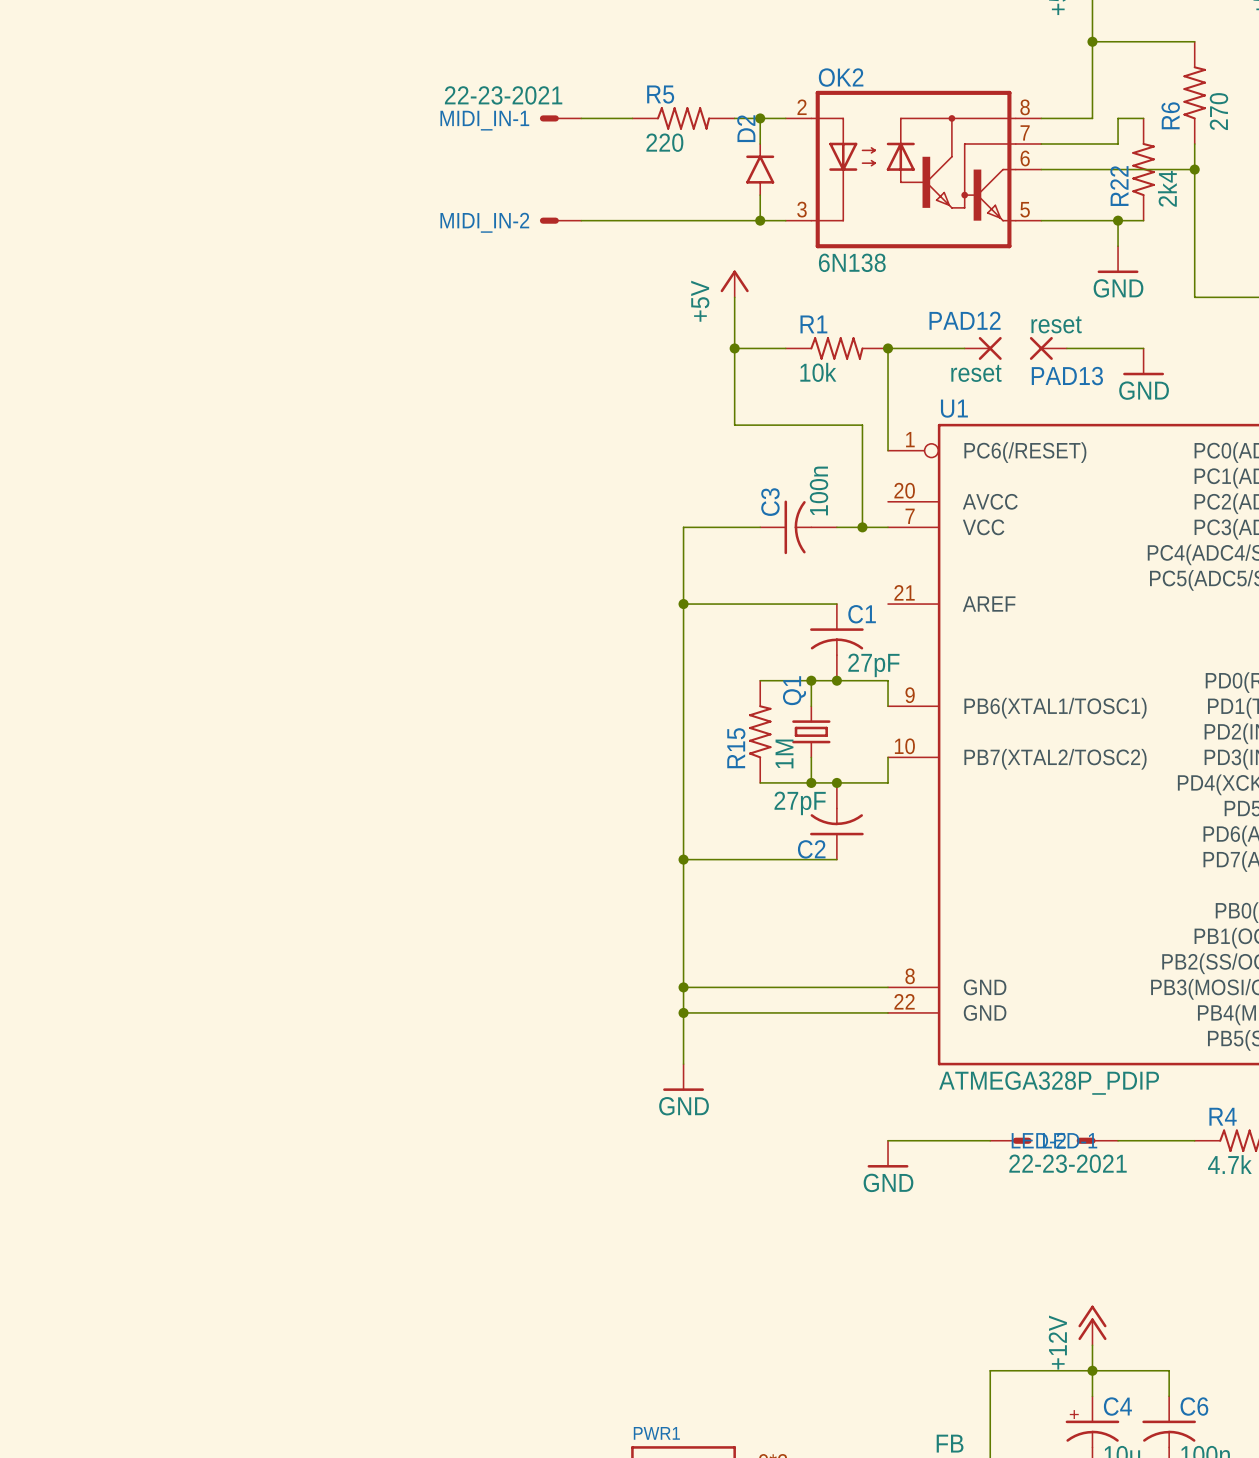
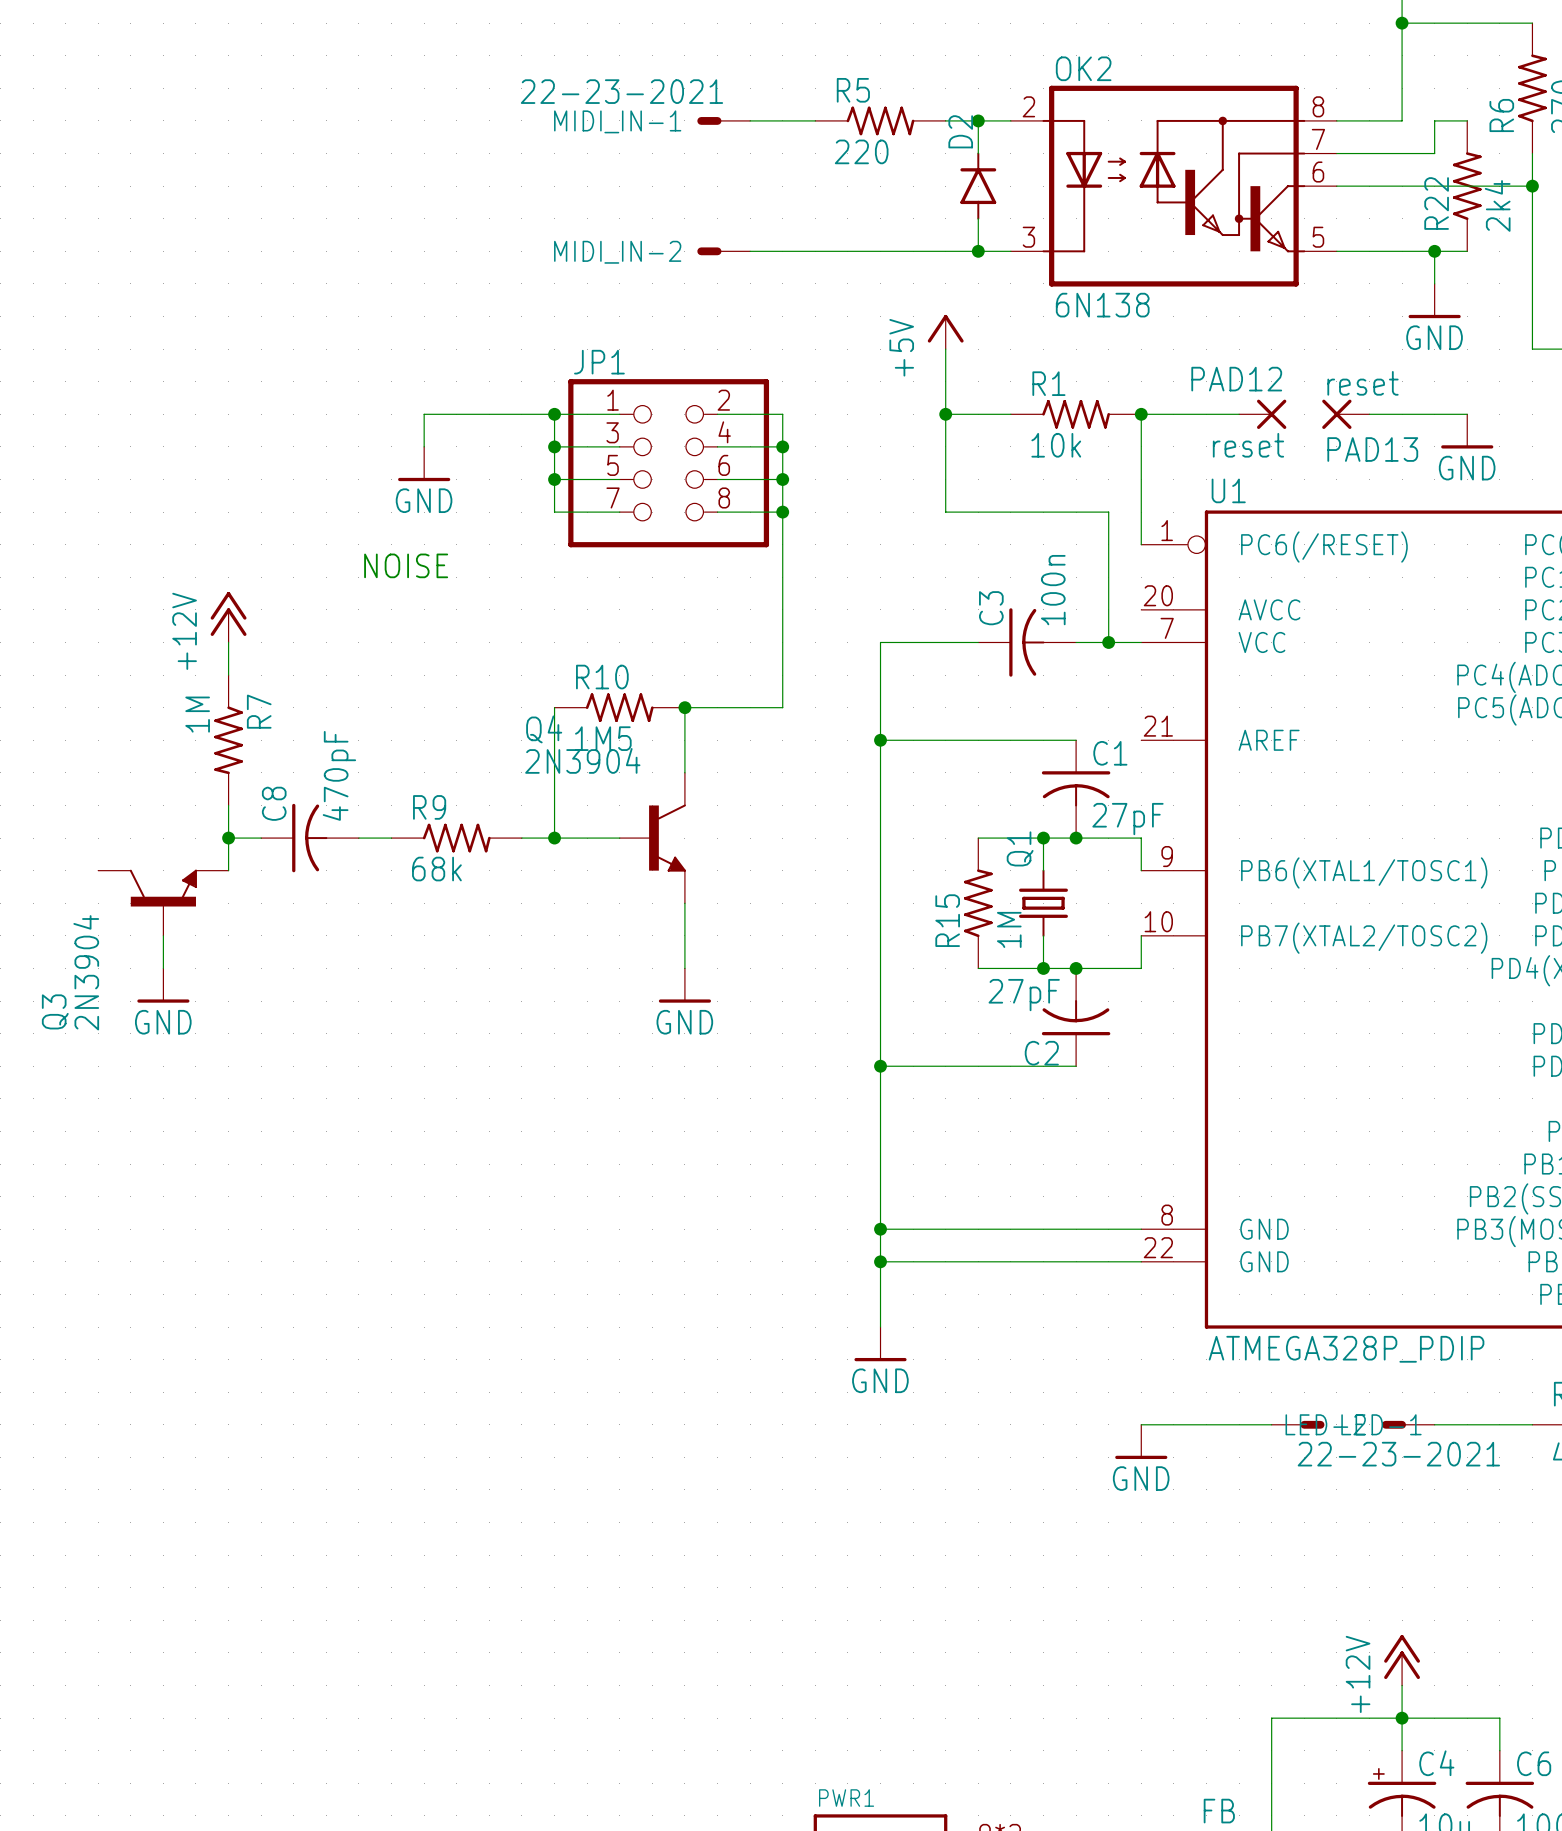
wire: none -> (554, 414) (554, 512) (619, 512)
junction: none -> (554, 414)
wire: none -> (619, 414) (424, 414) (424, 446)
wire: none -> (717, 414) (782, 414) (782, 707) (684, 707) (684, 772)
wire: none -> (554, 446) (619, 446)
junction: none -> (554, 446)
wire: none -> (717, 446) (782, 446)
junction: none -> (782, 446)
JP1: none -> (668, 463)
power symbol: none -> GND (424, 464)
wire: none -> (554, 479) (619, 479)
junction: none -> (554, 479)
wire: none -> (717, 479) (782, 479)
junction: none -> (782, 479)
wire: none -> (717, 512) (782, 512)
junction: none -> (782, 512)
text: none -> NOISE (406, 565)
power symbol: none -> +12V (228, 617)
wire: none -> (228, 642) (228, 675)
wire: none -> (554, 707) (554, 838)
R10: none -> 1M5 (619, 707)
junction: none -> (684, 707)
R7: none -> 1M (228, 740)
wire: none -> (228, 805) (228, 870)
wire: none -> (228, 838) (261, 838)
junction: none -> (228, 838)
C8: none -> 470pF (310, 838)
wire: none -> (358, 838) (391, 838)
R9: none -> 68k (456, 838)
wire: none -> (521, 838) (619, 838)
junction: none -> (554, 838)
Q4: none -> 2N3904 (652, 838)
Q3: none -> 2N3904 (163, 902)
wire: none -> (684, 903) (684, 968)
wire: none -> (163, 935) (163, 968)
power symbol: none -> GND (163, 985)
power symbol: none -> GND (684, 985)

